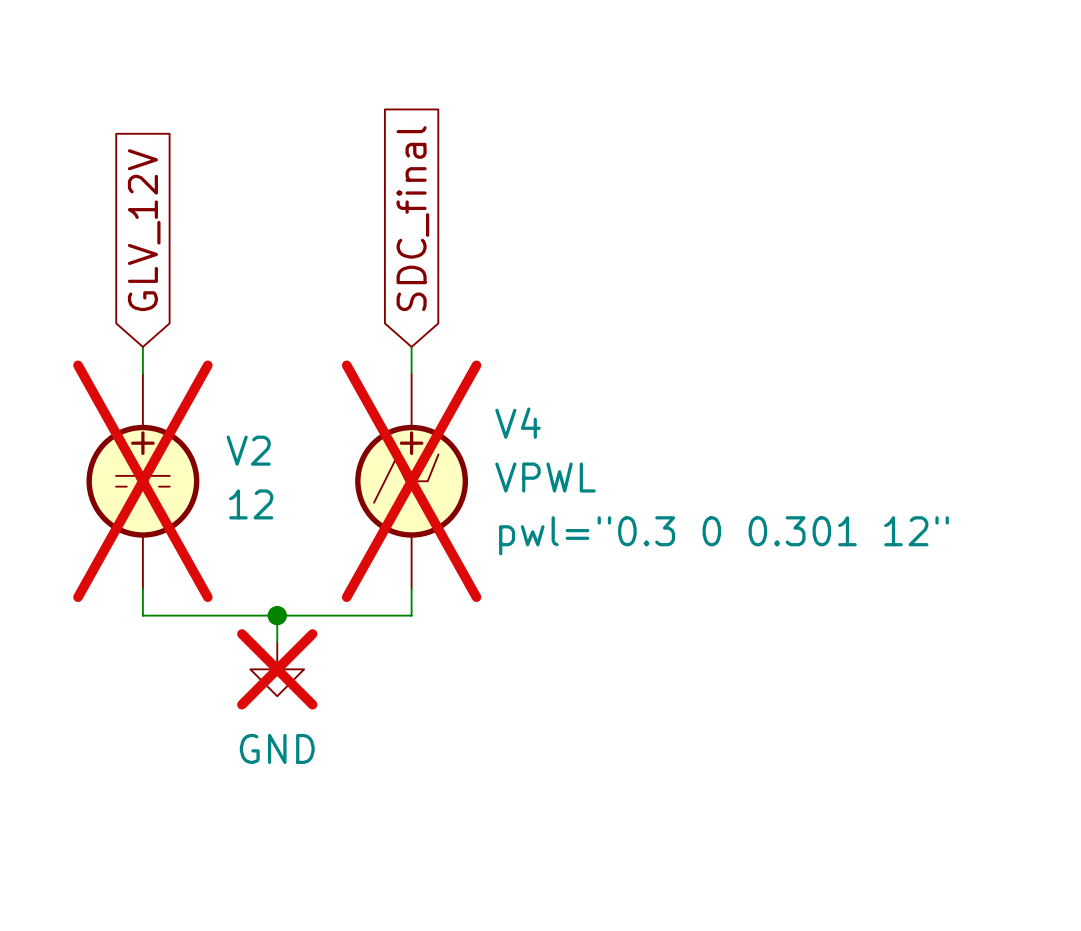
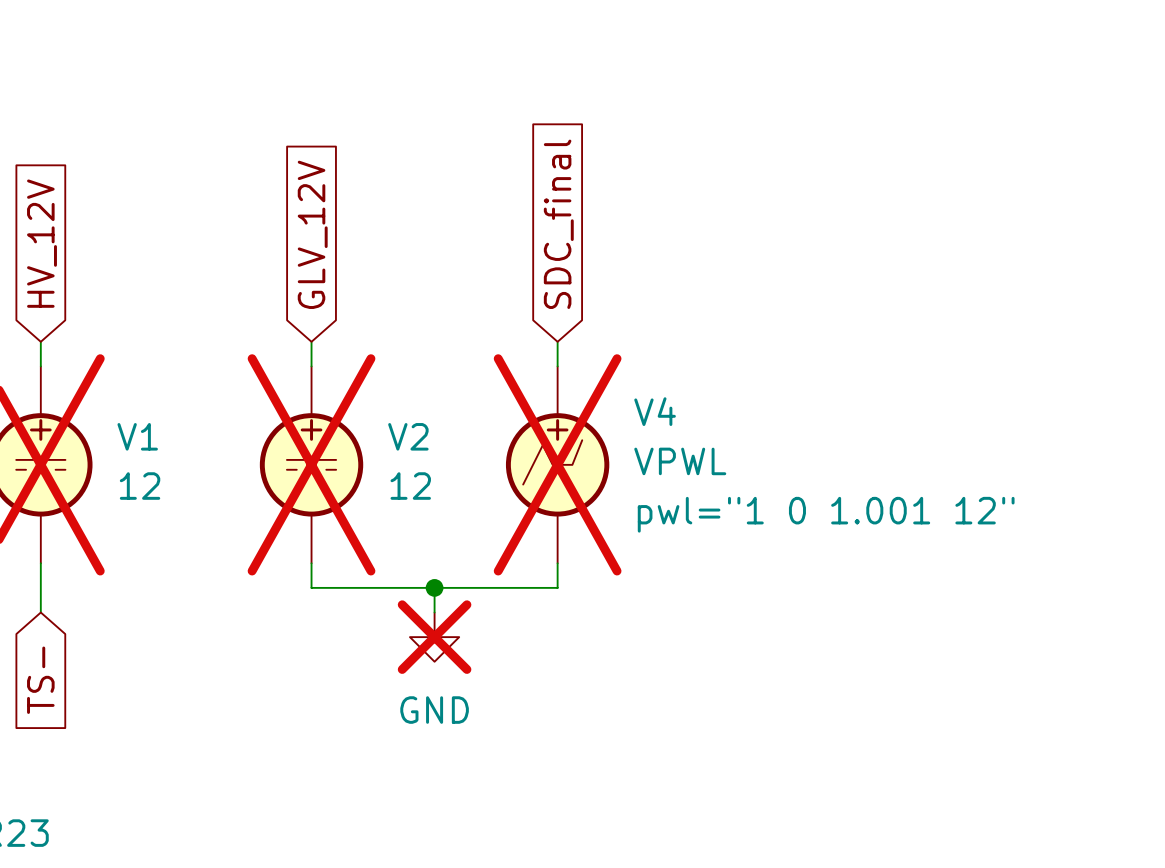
V4 text: pwl="0.3 0 0.301 12" (723, 535) -> pwl="1 0 1.001 12" (826, 514)

